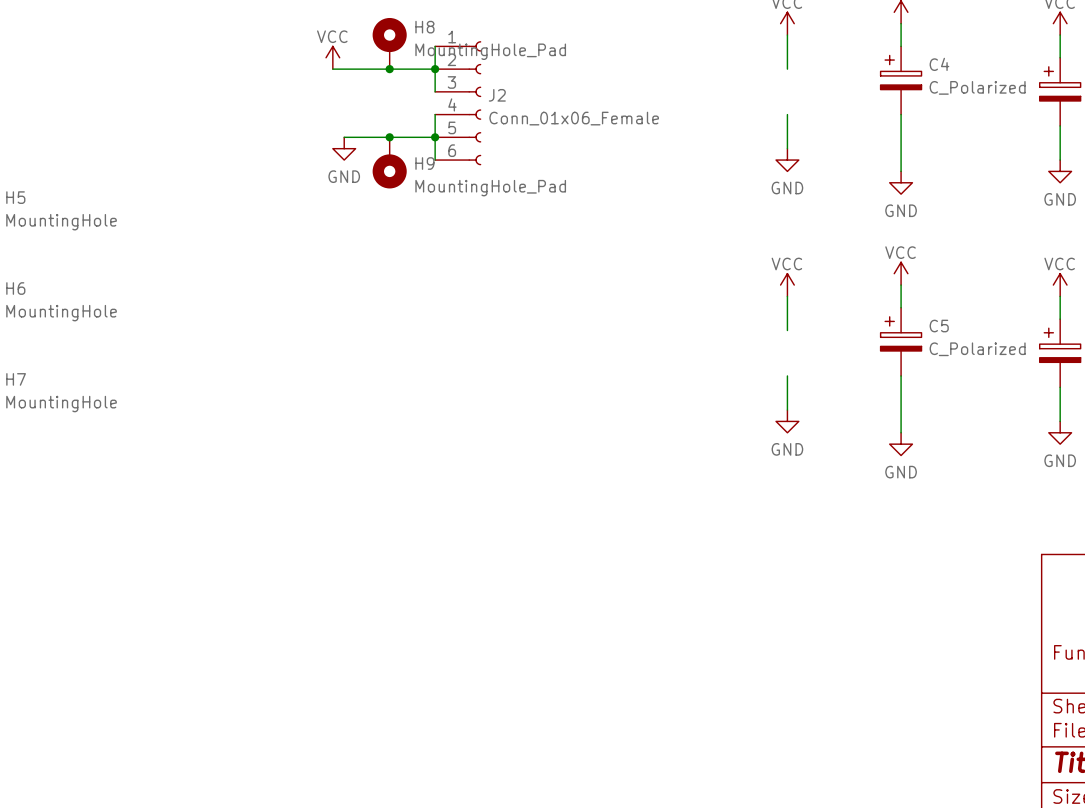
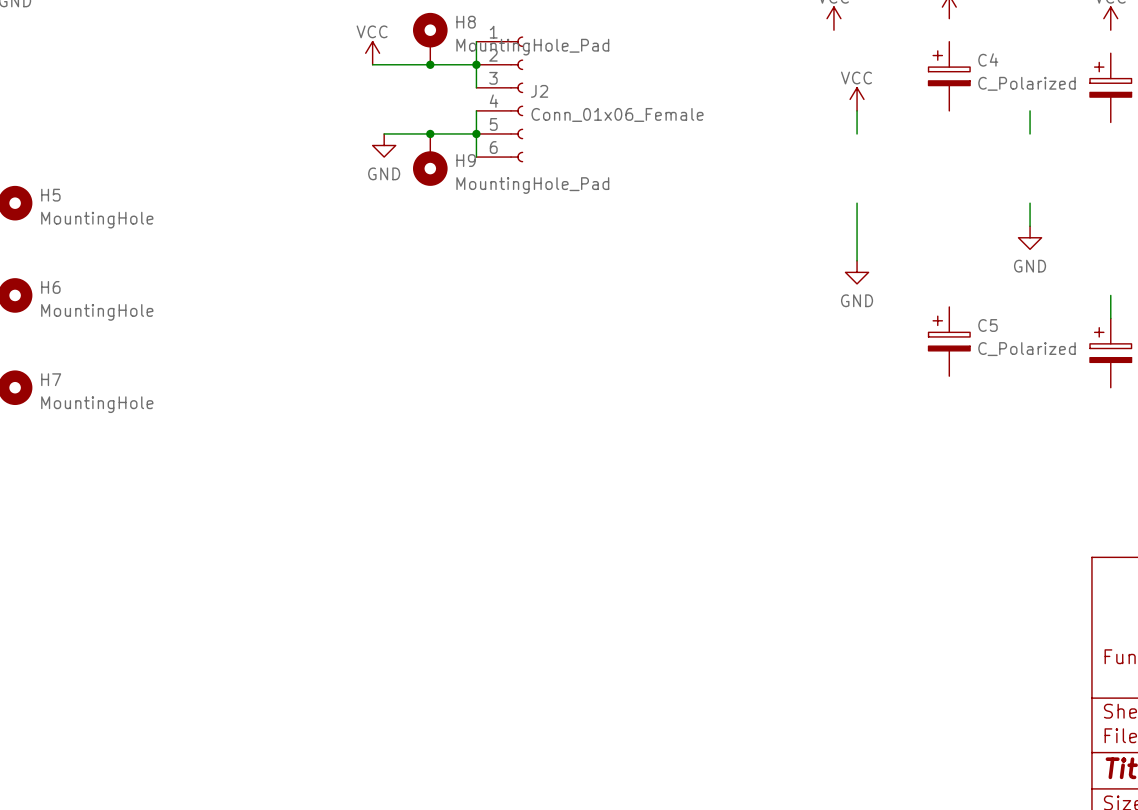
wire: (901, 23) (901, 46) -> (857, 110) (857, 133)
wire: (787, 35) (787, 69) -> none
wire: (1060, 35) (1060, 57) -> (1030, 110) (1030, 133)
power symbol: none -> VCC (857, 99)
wire: (787, 114) (787, 148) -> none
wire: (901, 114) (901, 171) -> (857, 203) (857, 260)
wire: (1060, 125) (1060, 160) -> none
power symbol: GND (787, 160) -> none
power symbol: GND (1060, 171) -> none
power symbol: GND (901, 182) -> none
power symbol: none -> GND (1030, 237)
power symbol: none -> GND (857, 272)
power symbol: VCC (901, 273) -> none
power symbol: VCC (787, 285) -> none
wire: (901, 285) (901, 307) -> (1030, 203) (1030, 226)
power symbol: VCC (1060, 285) -> none
wire: (787, 296) (787, 330) -> none
wire: (787, 375) (787, 410) -> none
wire: (901, 375) (901, 432) -> none
wire: (1060, 387) (1060, 421) -> none
power symbol: GND (787, 421) -> none
power symbol: GND (1060, 432) -> none
power symbol: GND (901, 444) -> none

